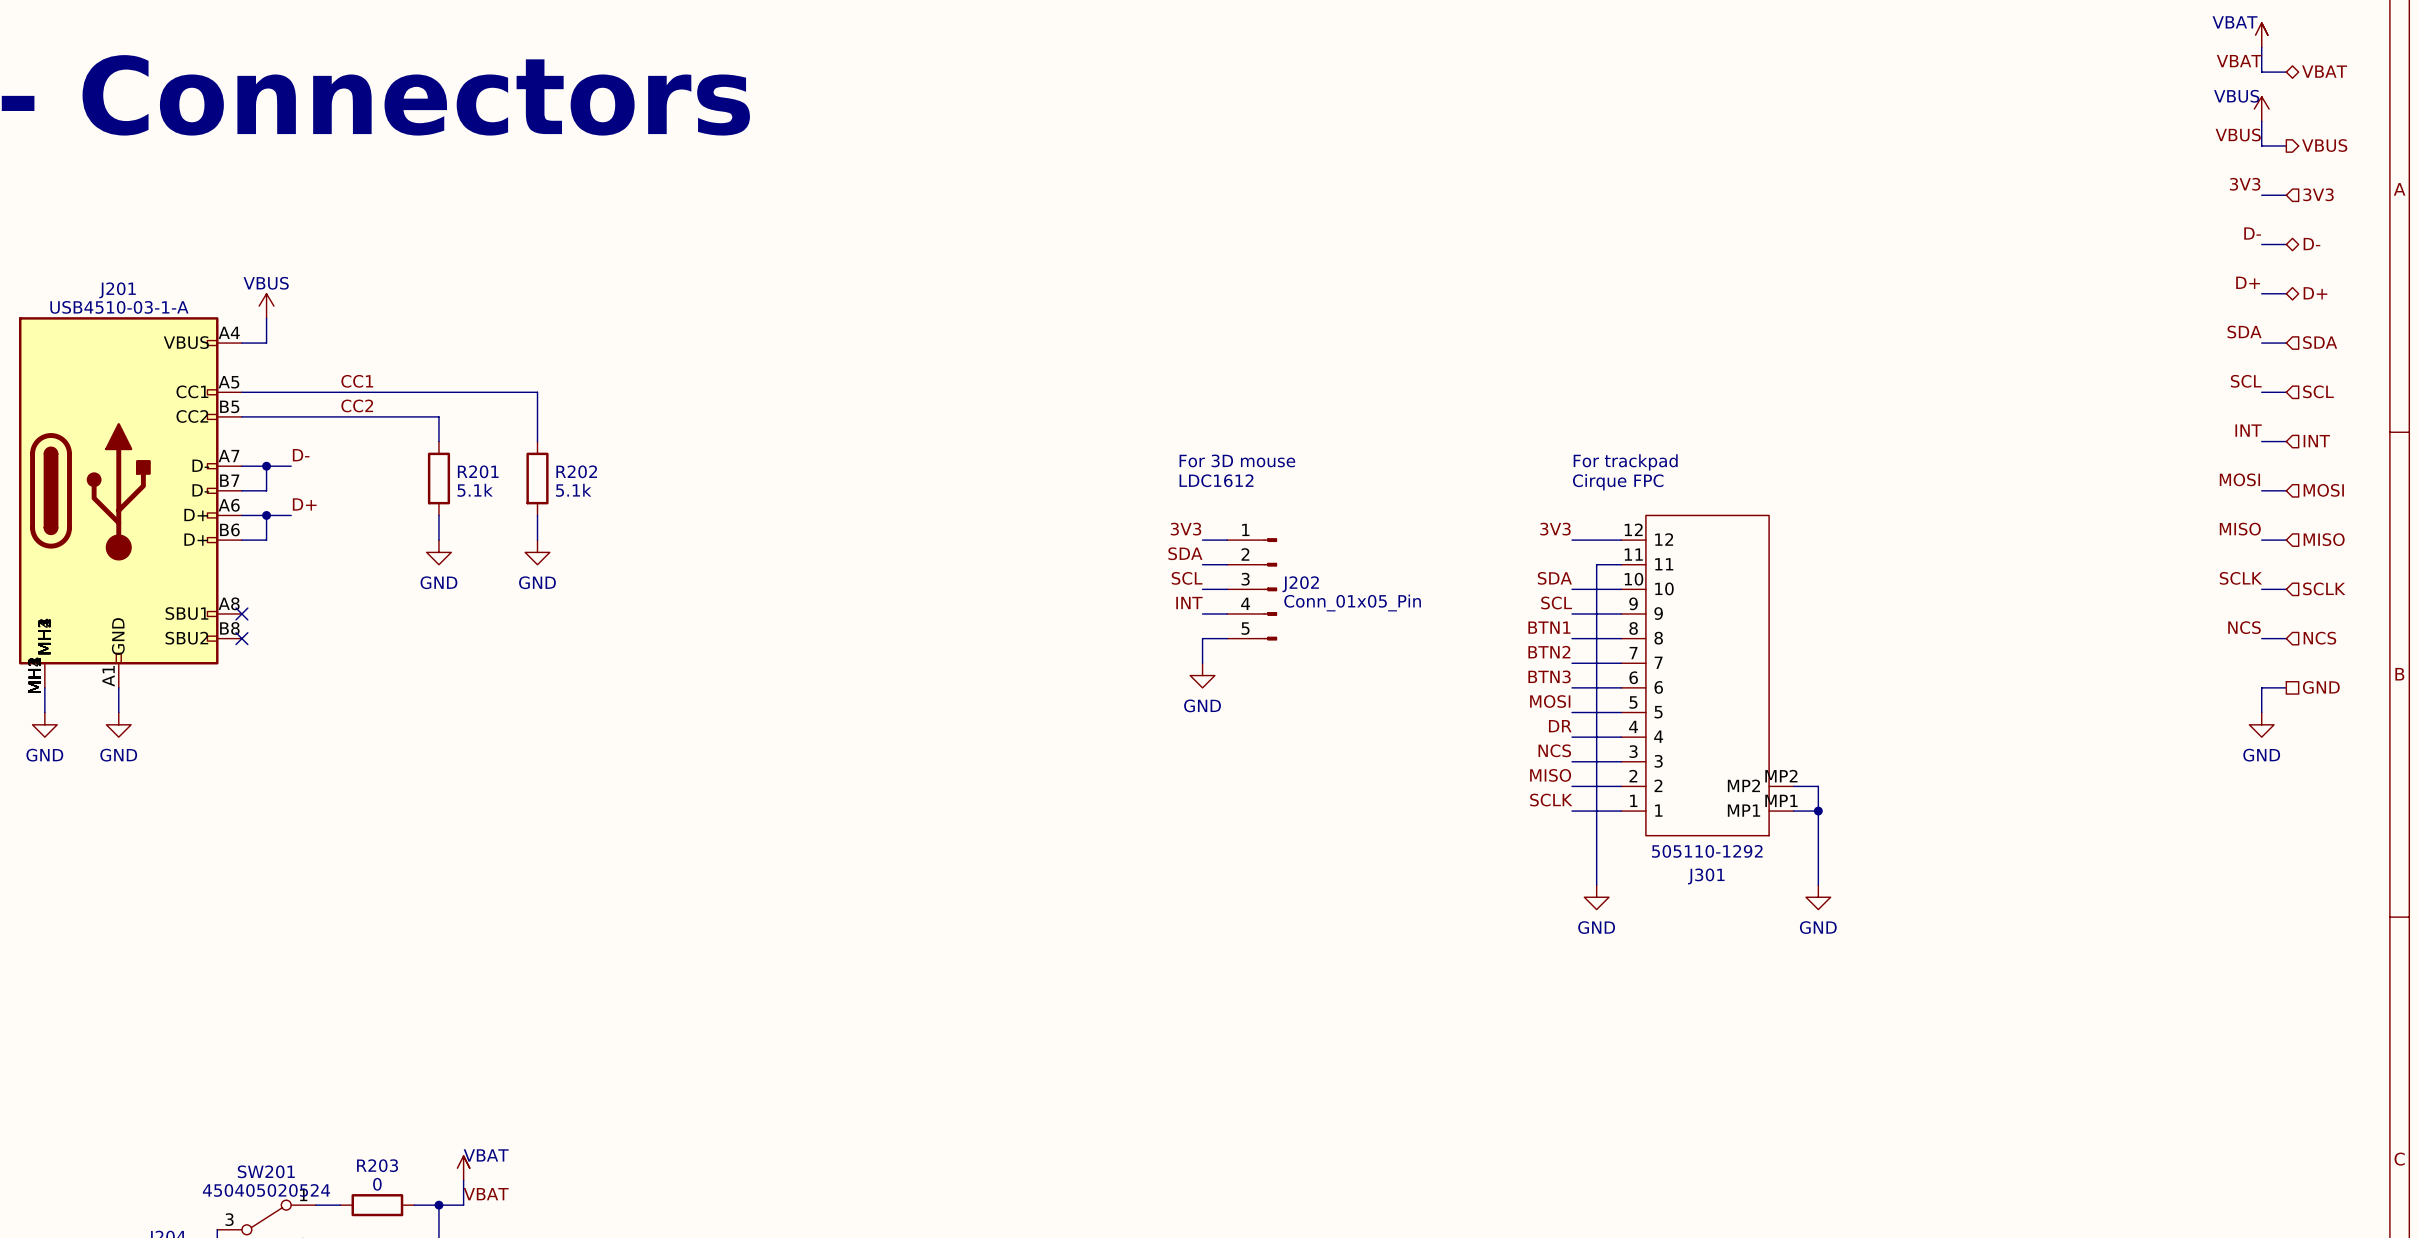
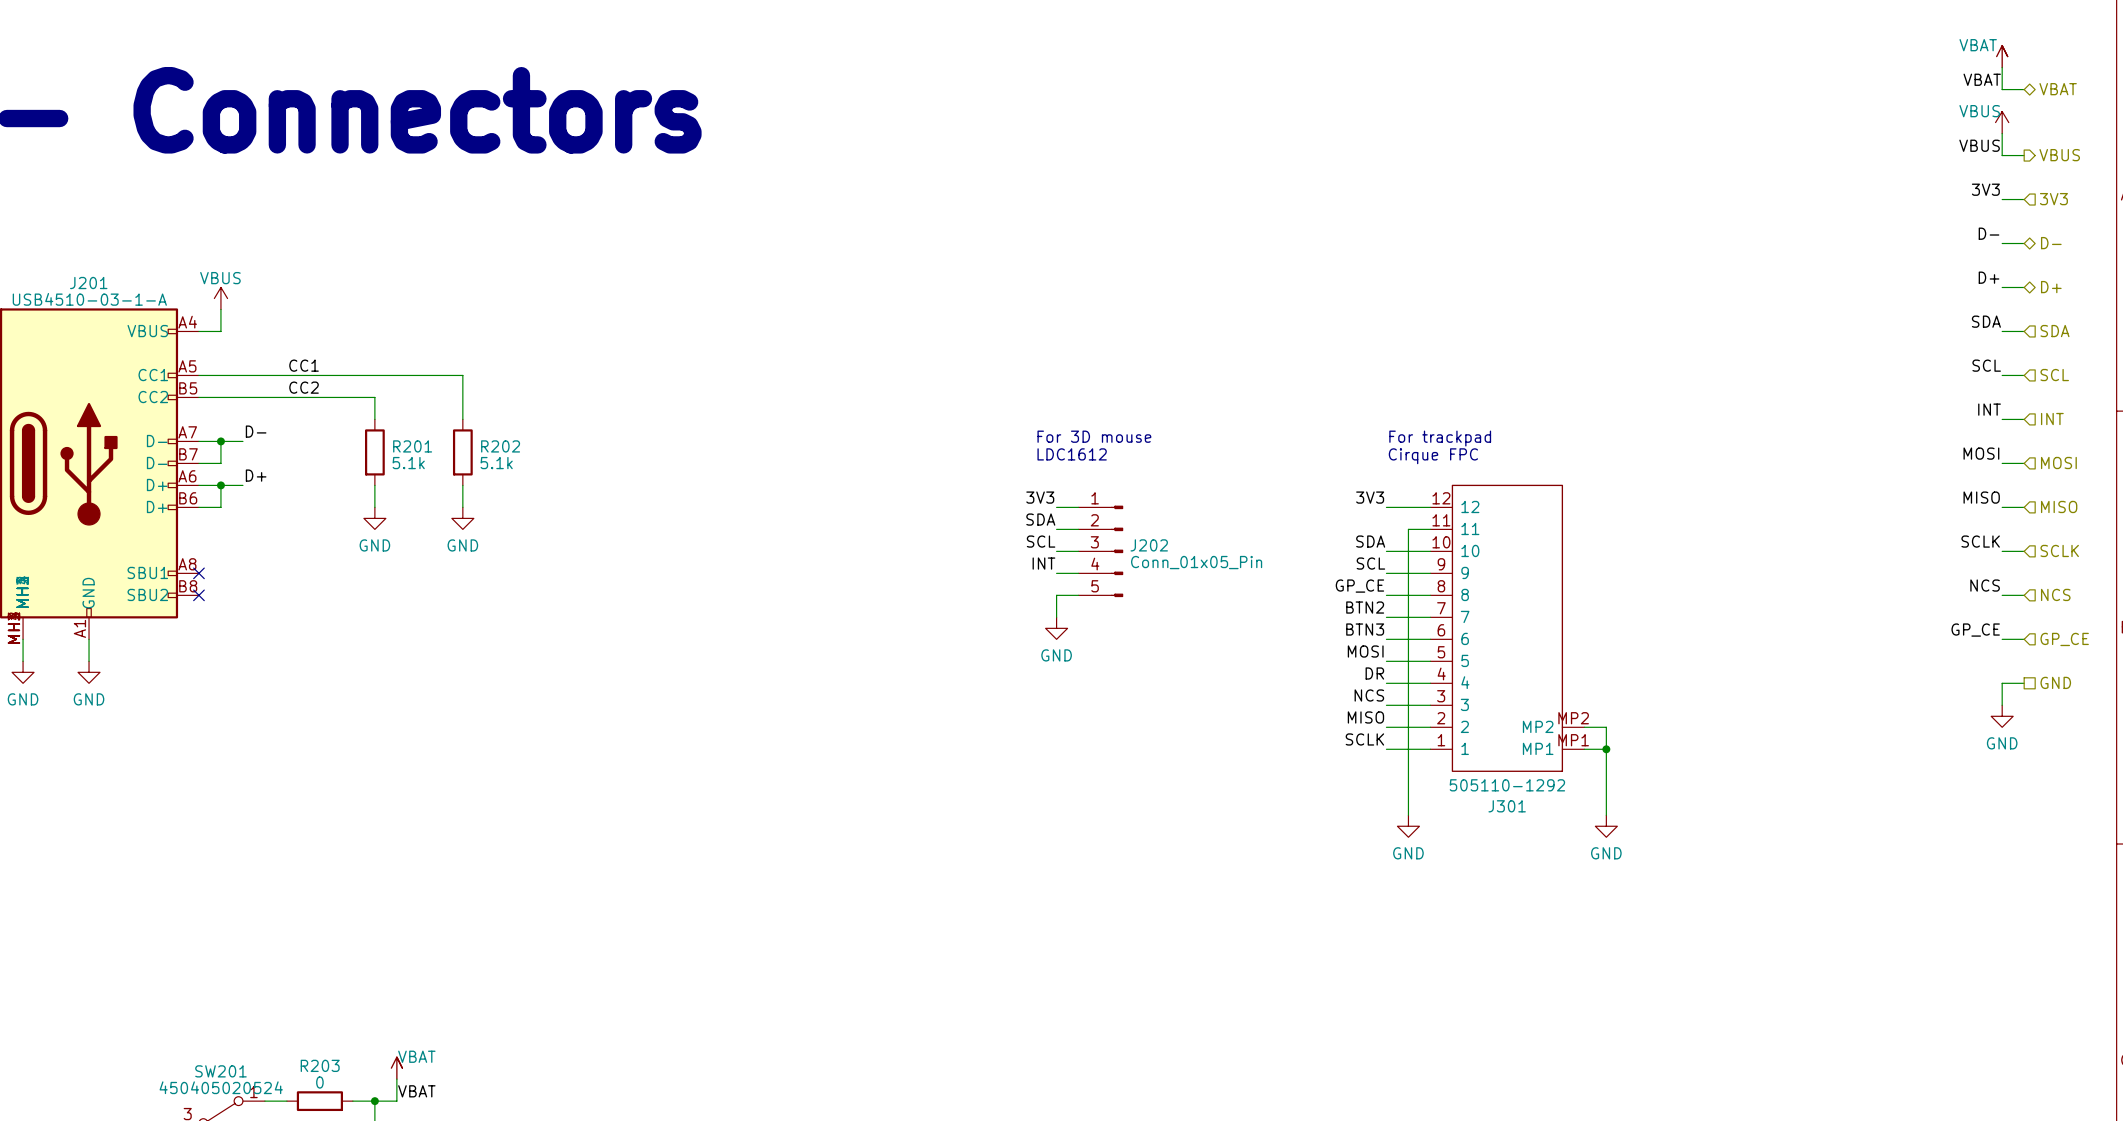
label: BTN1 (1549, 627) -> GP_CE (1359, 586)
label: none -> GP_CE (1975, 630)
wire: (2261, 687) (2261, 712) -> none
hierarchical label shape: passive (2321, 687) -> input (2064, 639)
hierarchical label: GND (2321, 687) -> GP_CE (2064, 639)
power symbol position: GND (2261, 724) -> GND (2002, 716)
hierarchical label: none -> GND (2055, 682)
wire: none -> (2024, 683) (2002, 683) (2002, 705)

